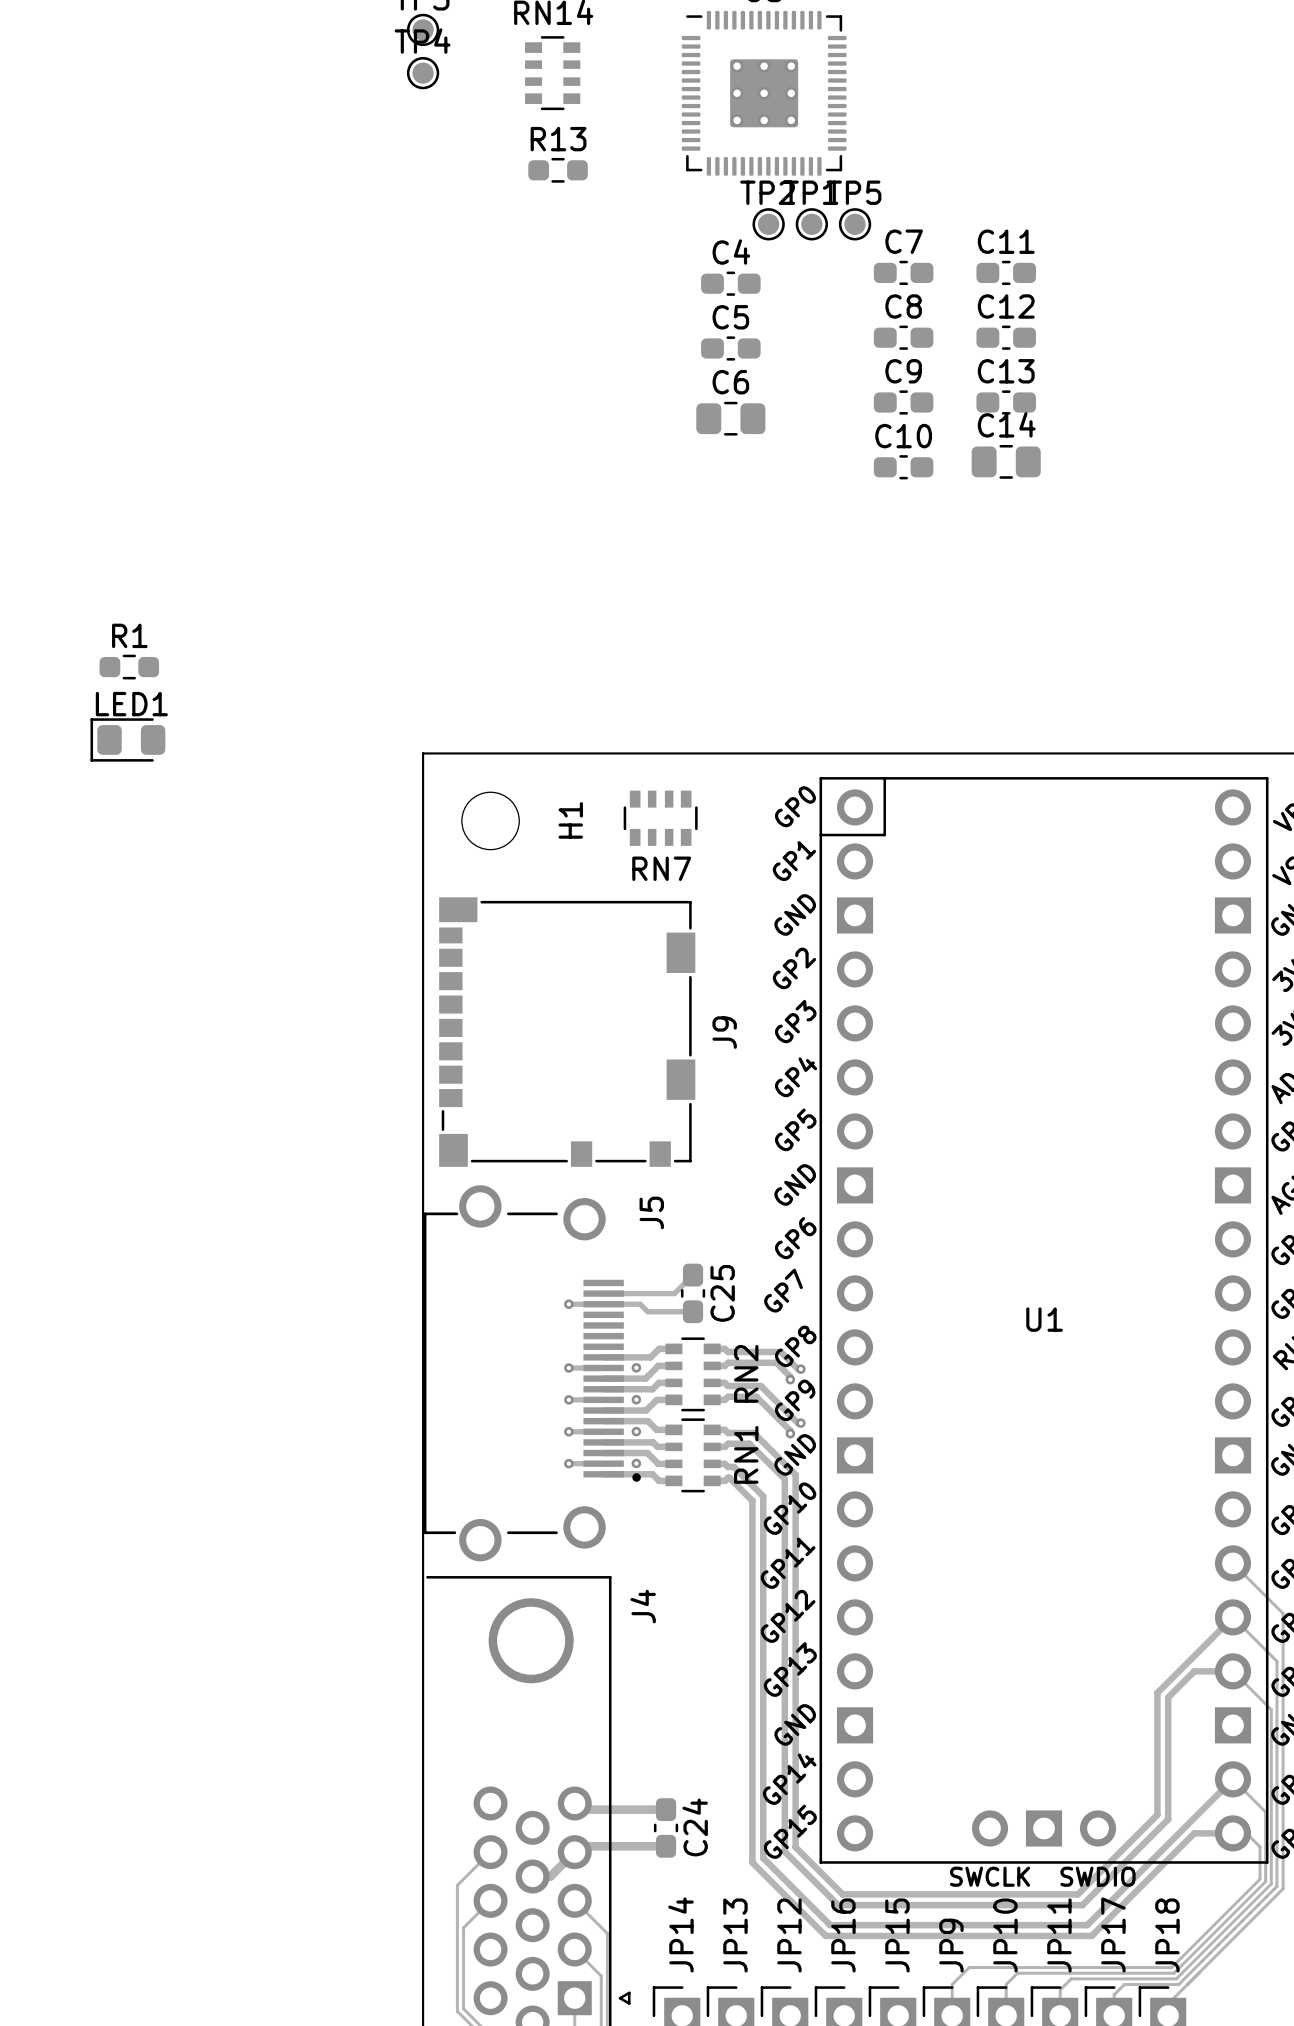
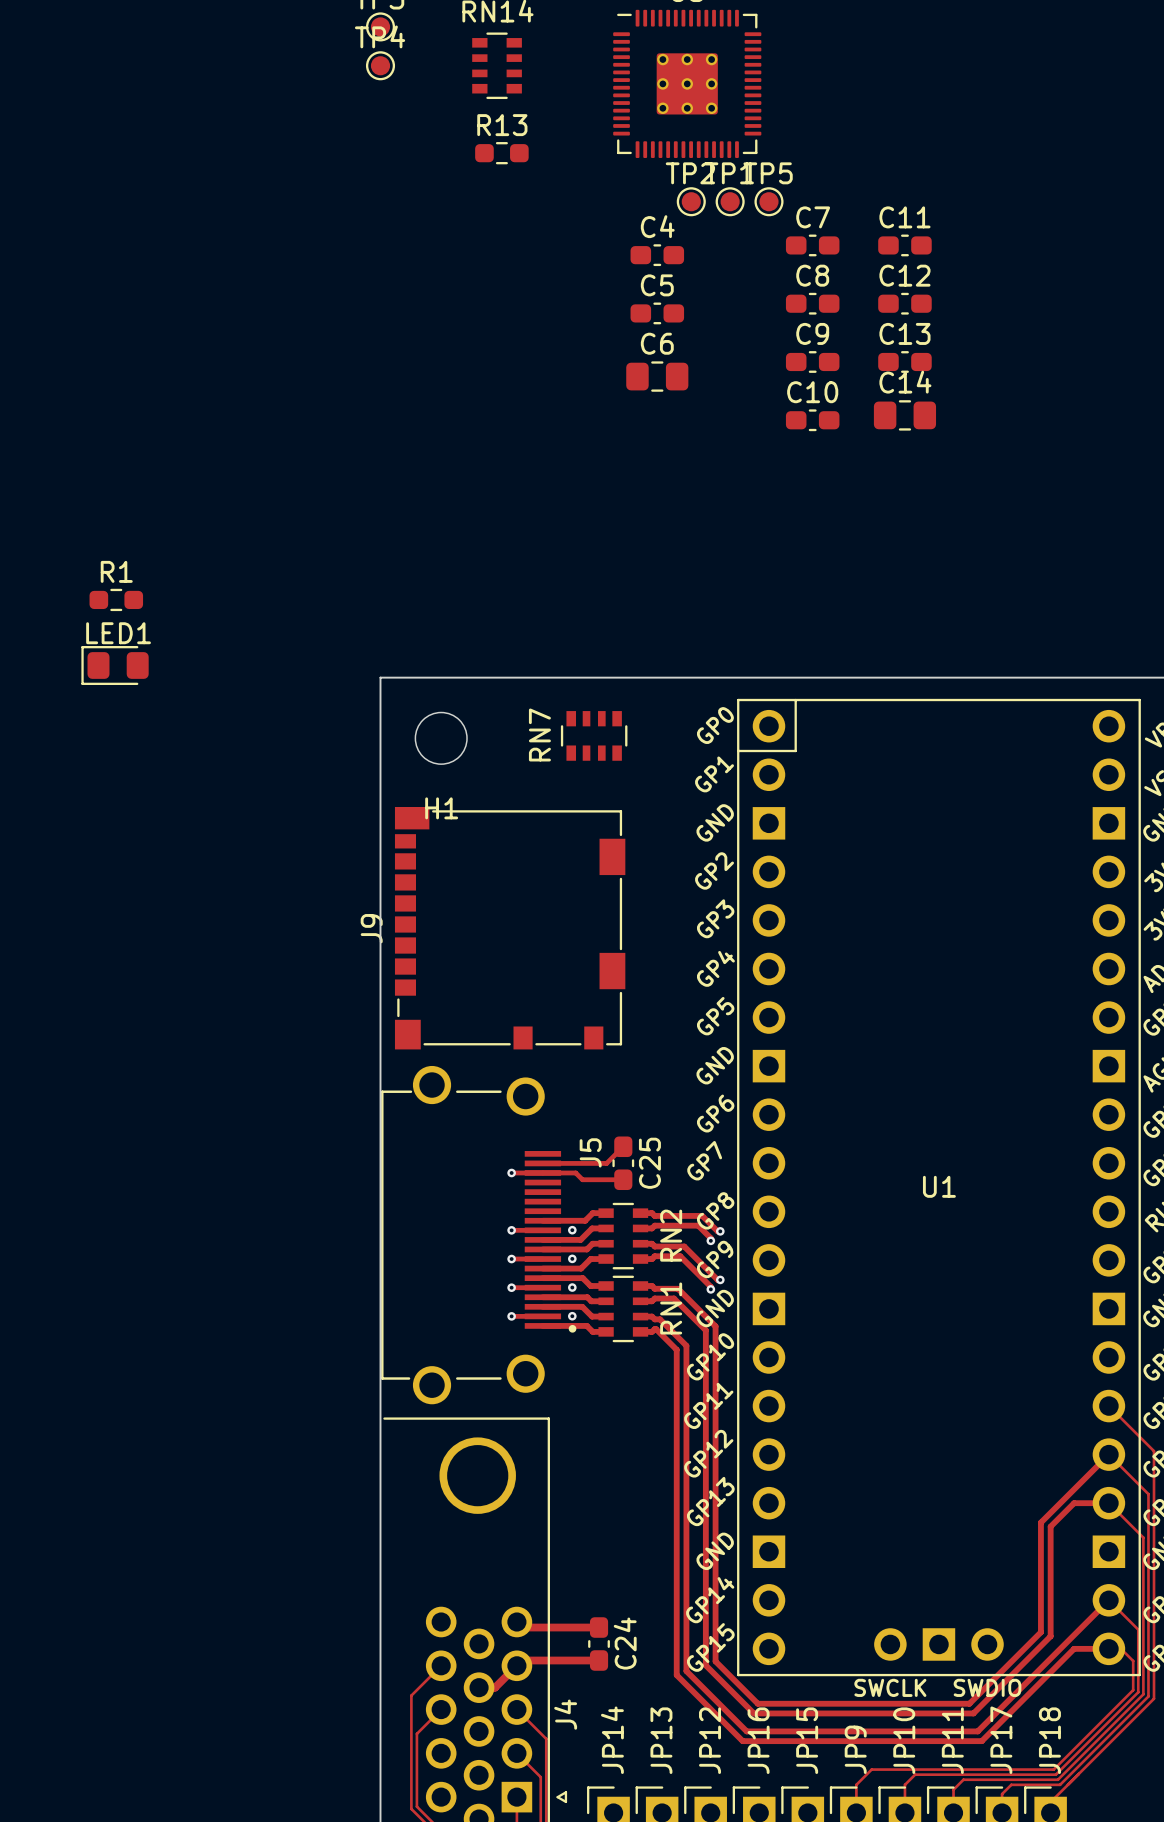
H1 name rotation: 0° (570, 820) -> 90° clockwise (441, 808)
H1 name position: H1 (570, 820) -> H1 (441, 808)
RN7 name rotation: 0° (661, 868) -> 90° counterclockwise (539, 735)
RN7 name position: RN7 (661, 868) -> RN7 (539, 735)
J9 name position: J9 (724, 1032) -> J9 (371, 928)
J5 name position: J5 (651, 1212) -> J5 (590, 1152)
J4 name position: J4 (643, 1606) -> J4 (565, 1714)

